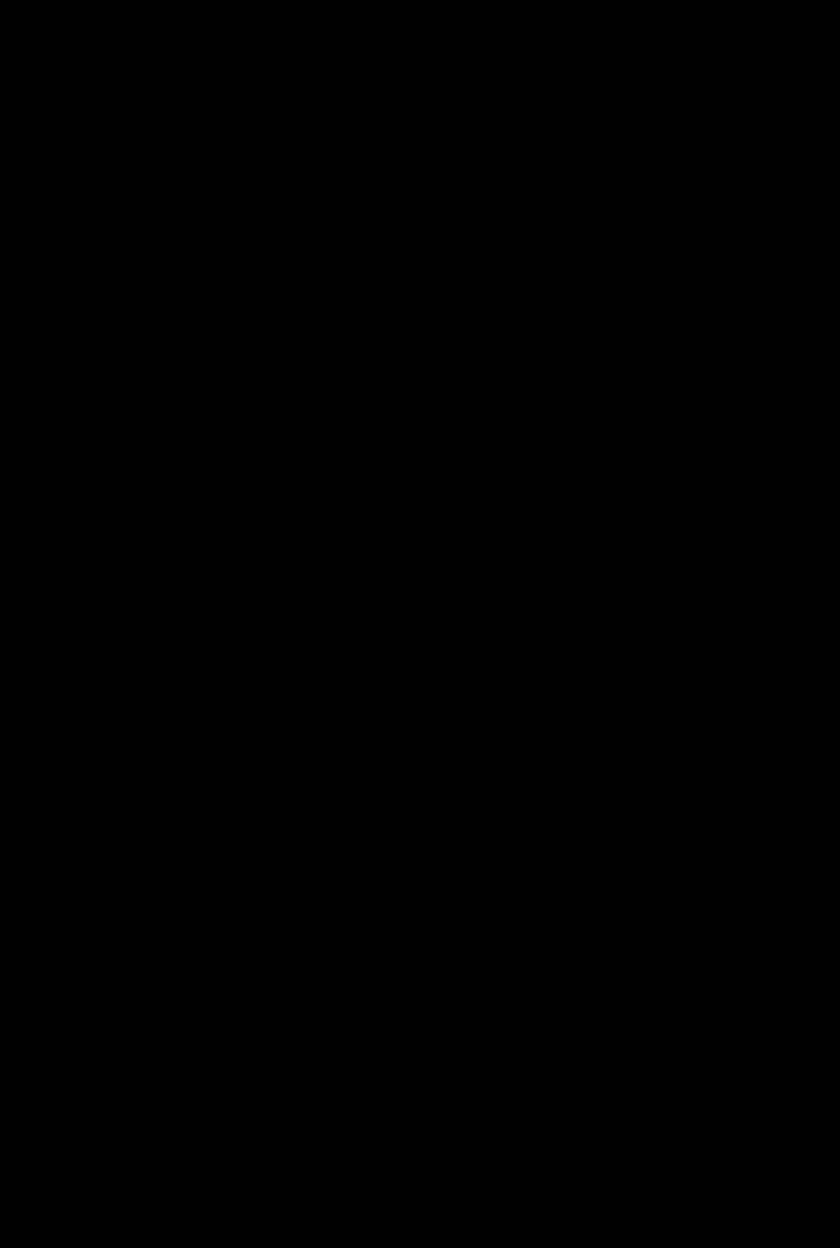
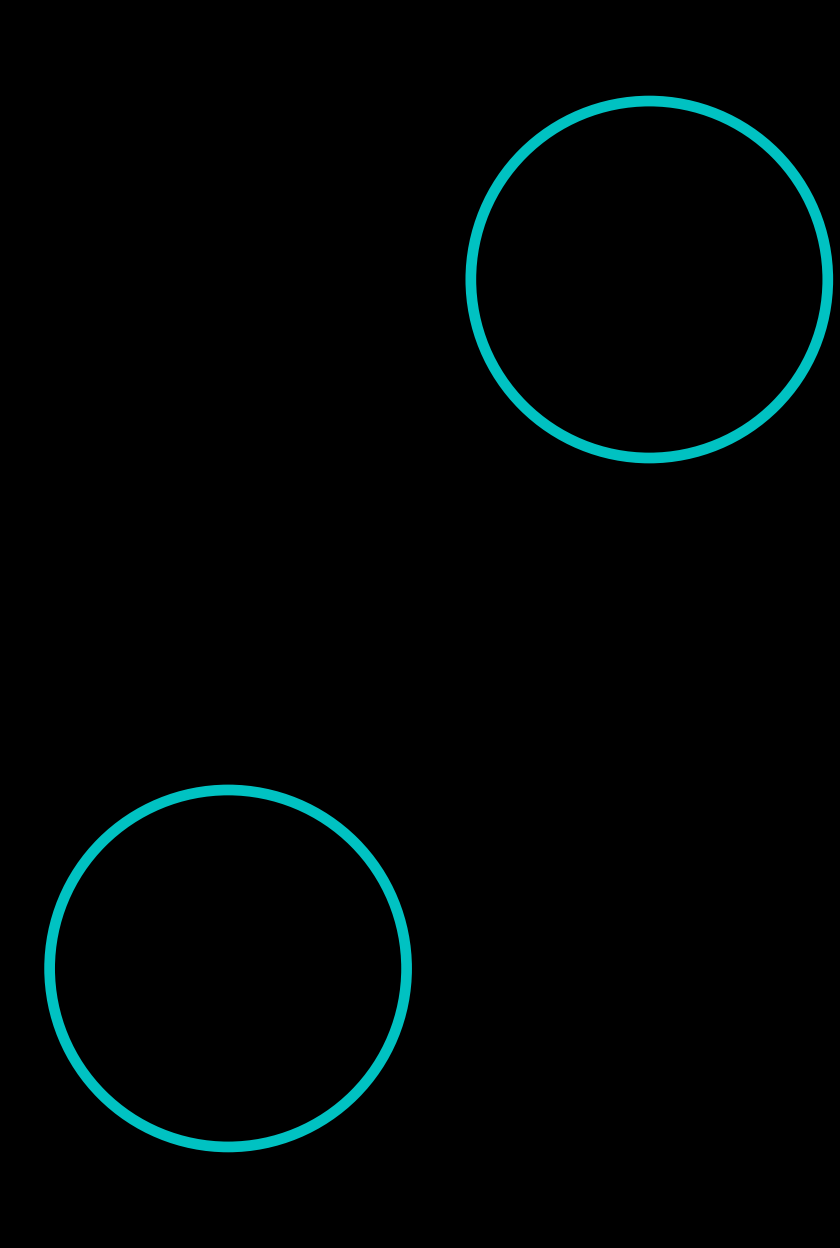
drawing: none -> [465, 95, 834, 464]
drawing: none -> [44, 784, 412, 1153]

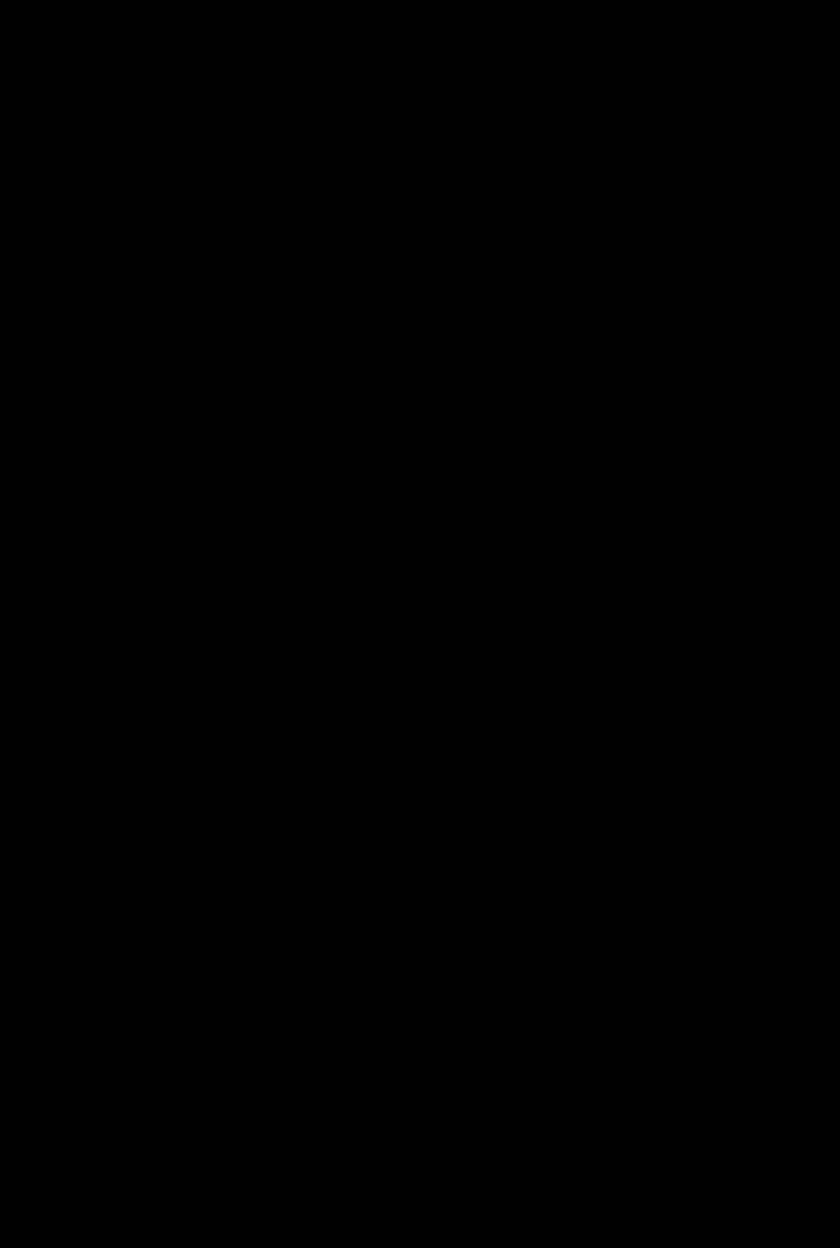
drawing: [465, 95, 834, 464] -> none
drawing: [44, 784, 412, 1153] -> none

